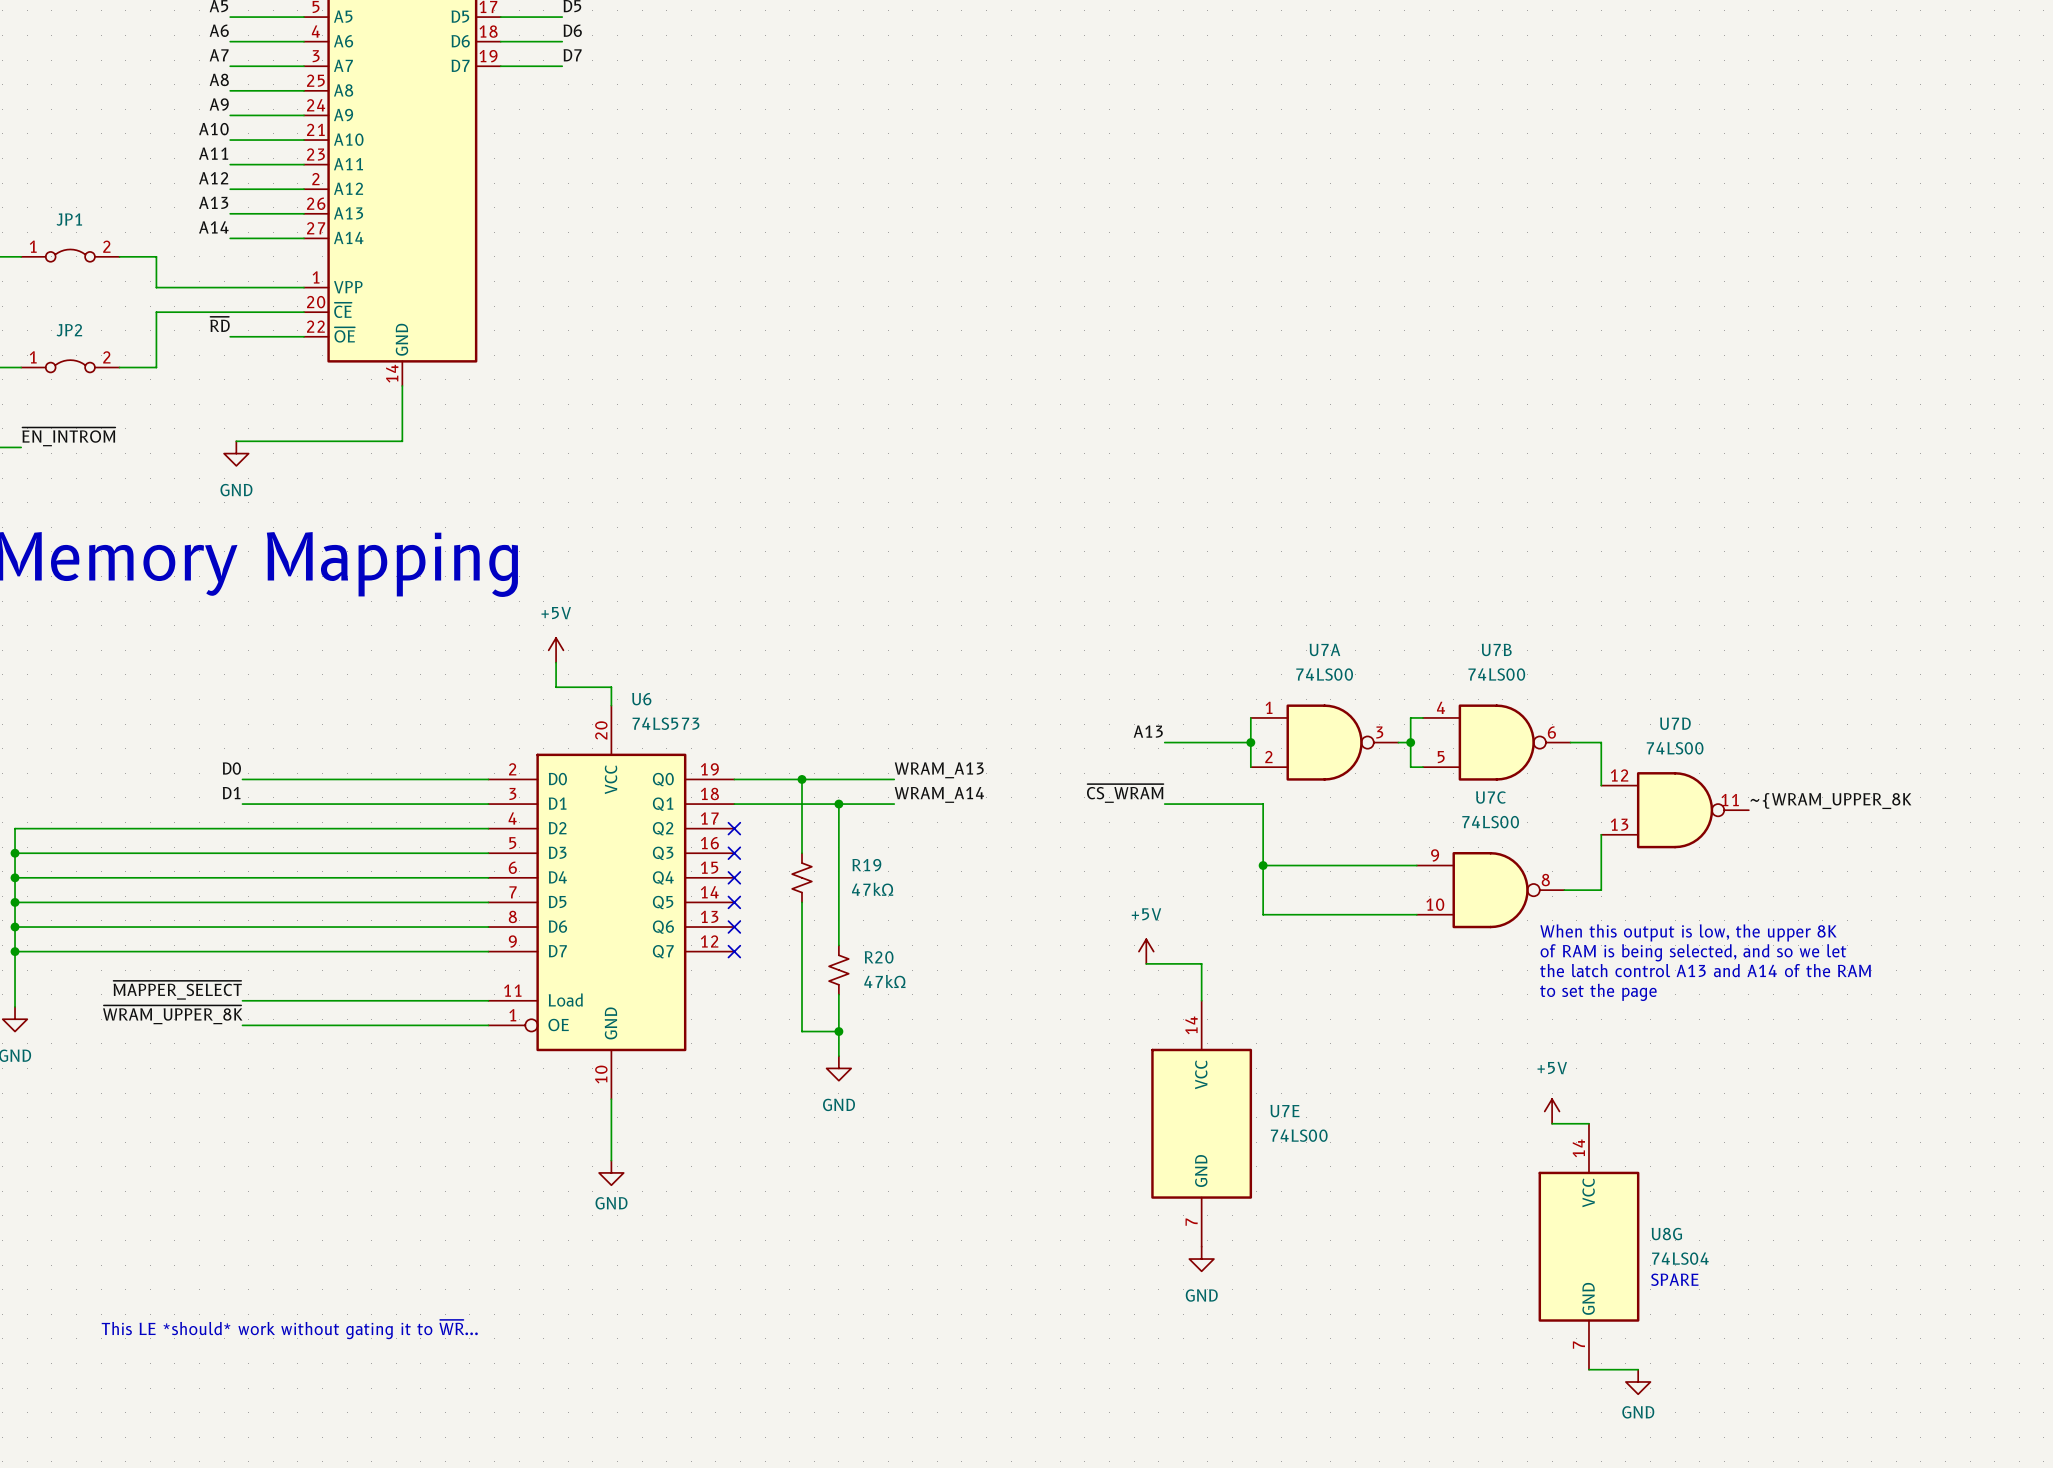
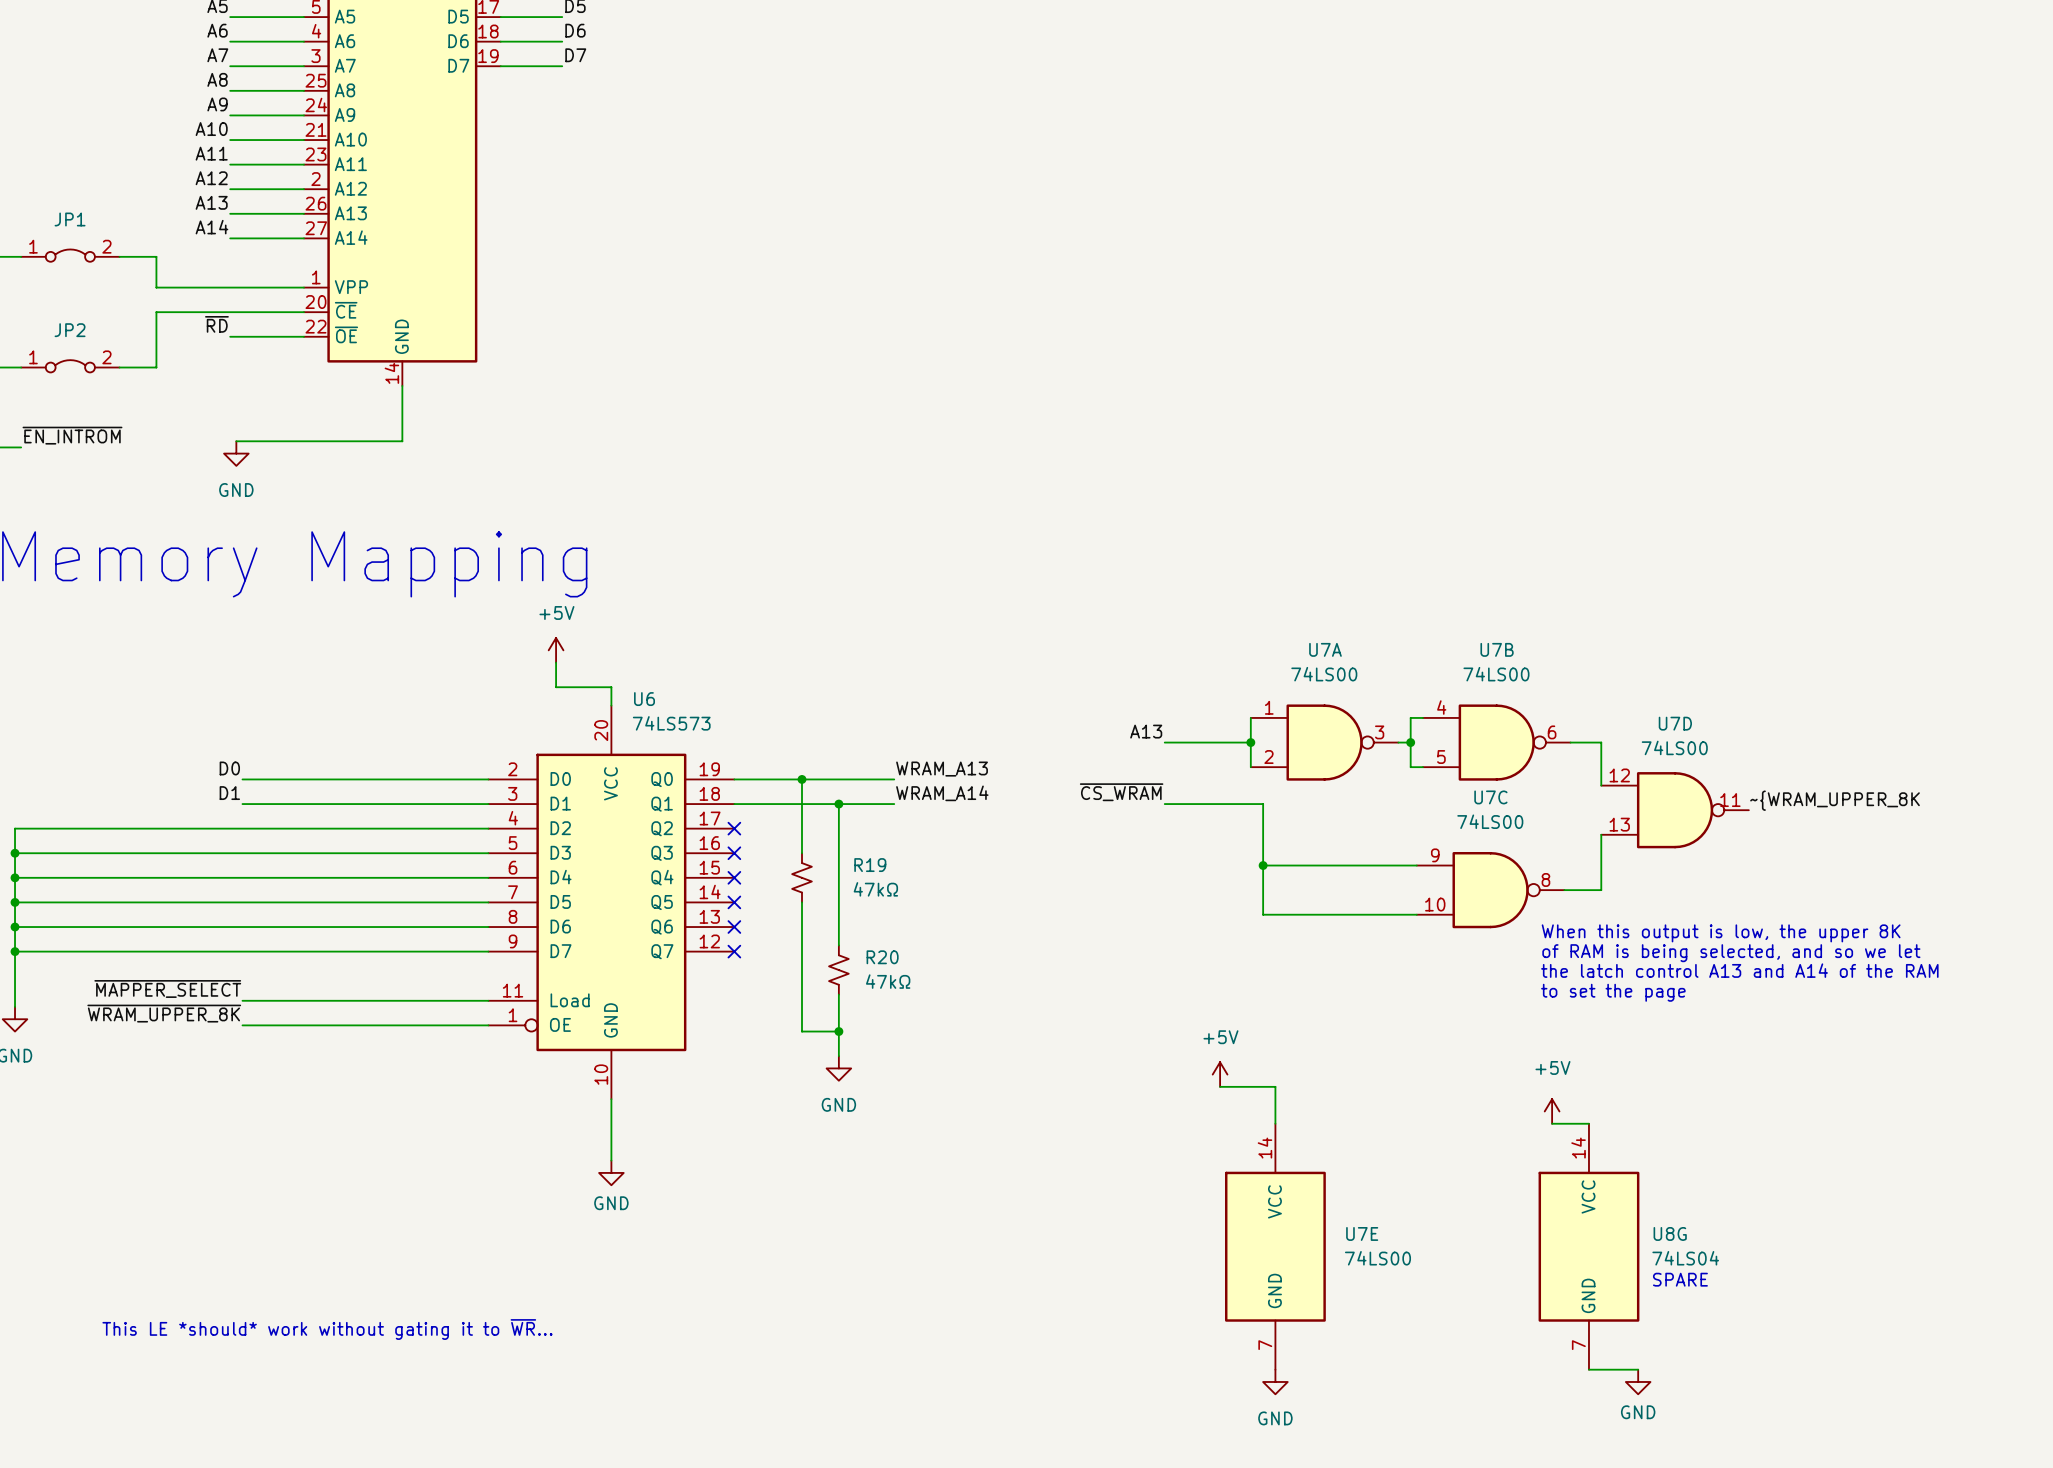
power symbol position: +5V (1146, 951) -> +5V (1220, 1074)
wire: (1146, 963) (1201, 963) (1201, 1000) -> (1220, 1086) (1275, 1086) (1275, 1123)
U7E position: (1201, 1123) -> (1275, 1246)
power symbol position: GND (1201, 1259) -> GND (1275, 1381)

